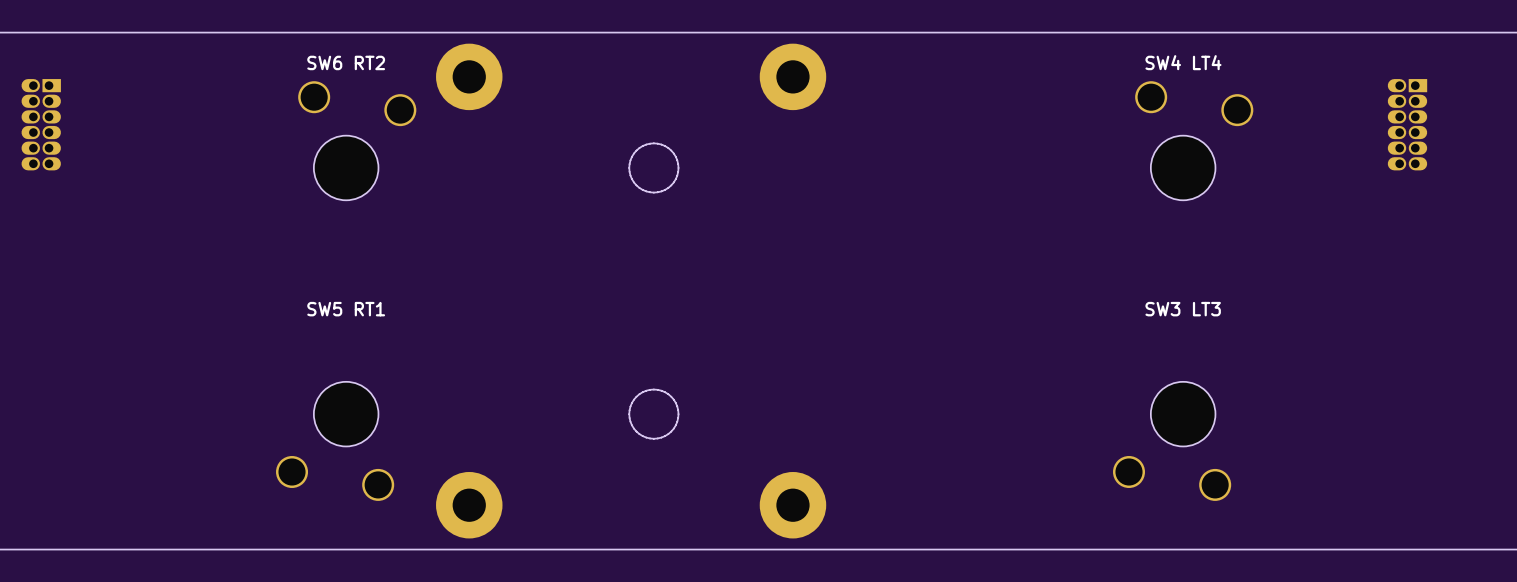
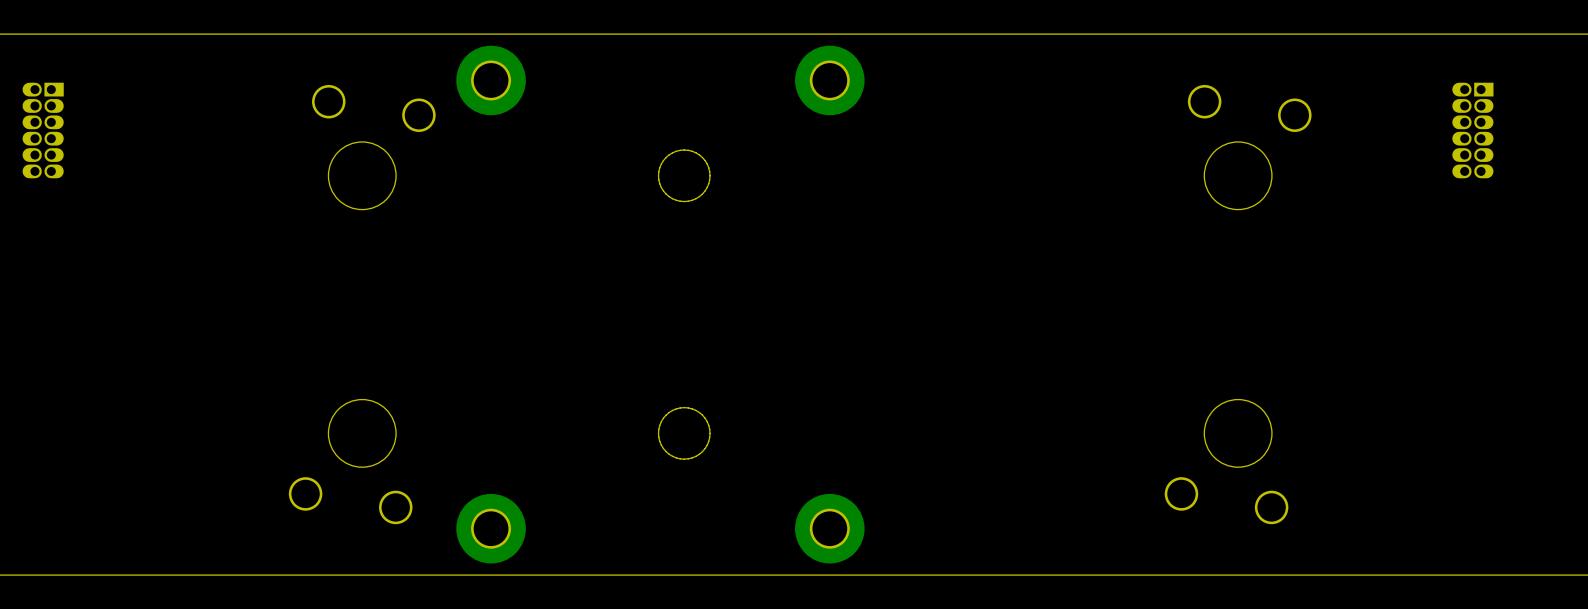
text: SW6 RT2 (346, 62) -> none
text: SW4 LT4 (1183, 62) -> none
text: SW5 RT1 (346, 309) -> none
text: SW3 LT3 (1183, 309) -> none

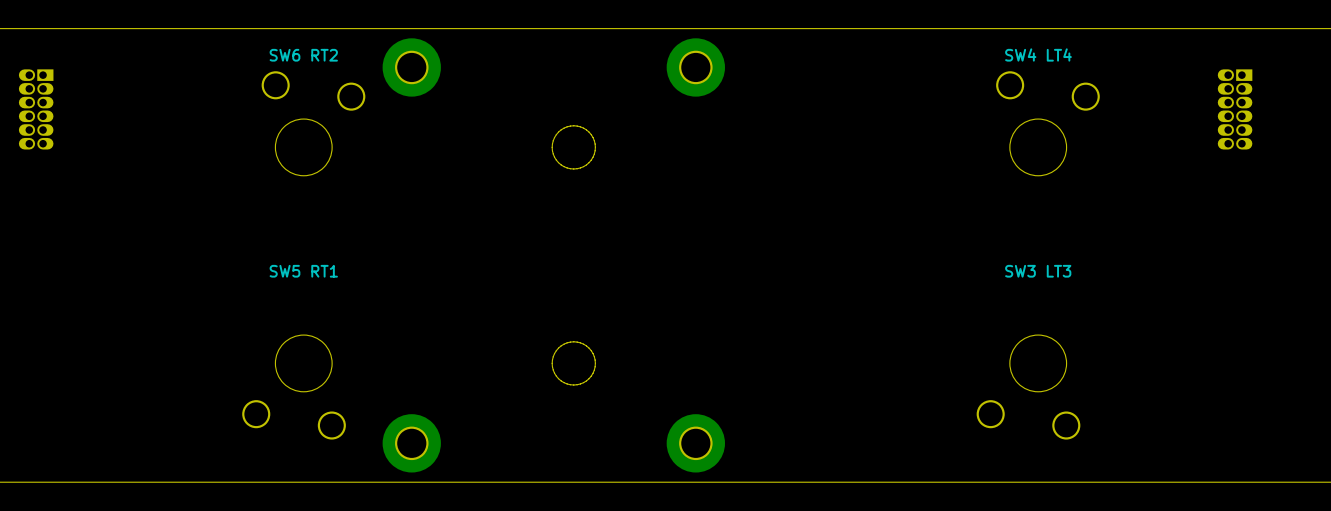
text: none -> SW6 RT2 (303, 55)
text: none -> SW4 LT4 (1038, 54)
text: none -> SW5 RT1 (303, 271)
text: none -> SW3 LT3 (1038, 271)

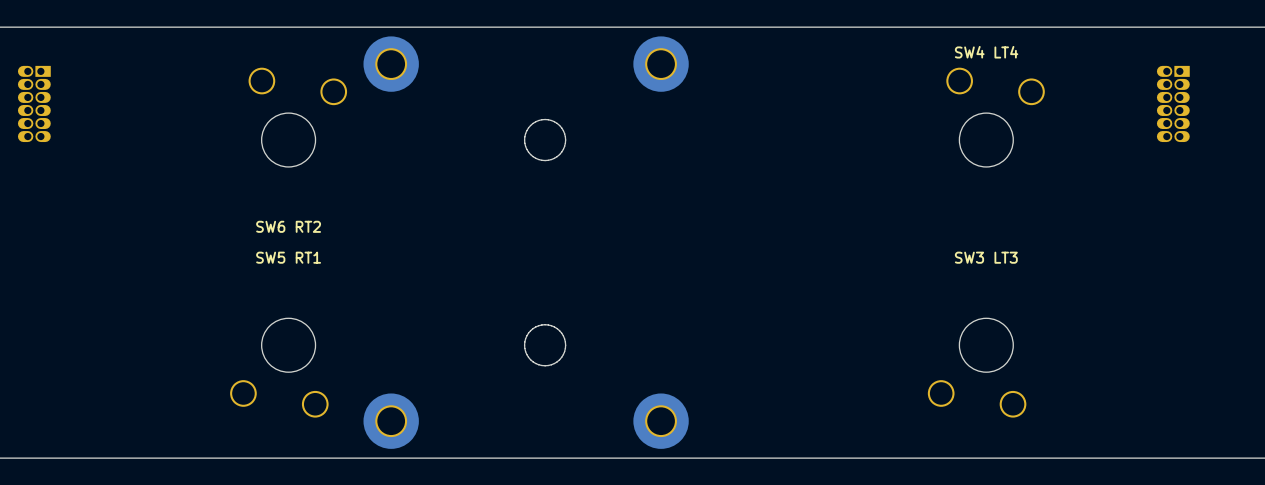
text position: SW6 RT2 (303, 55) -> SW6 RT2 (288, 226)

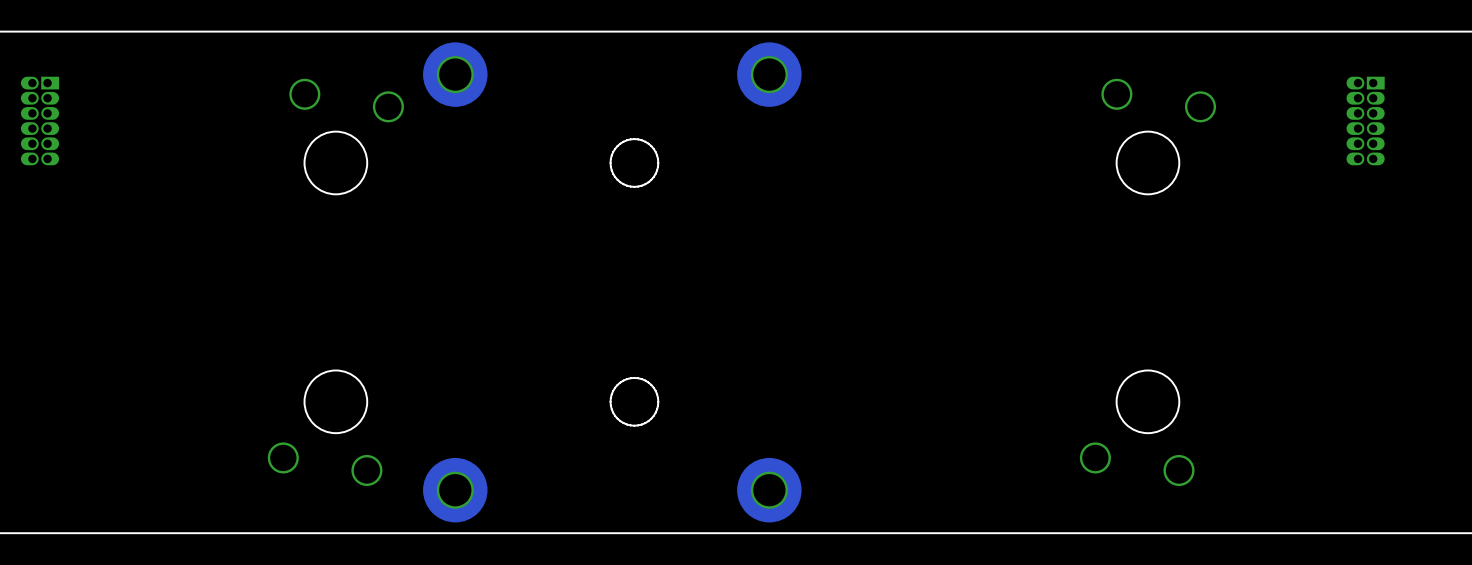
text: SW4 LT4 (986, 52) -> none
text: SW6 RT2 (288, 226) -> none
text: SW5 RT1 (288, 257) -> none
text: SW3 LT3 (986, 257) -> none

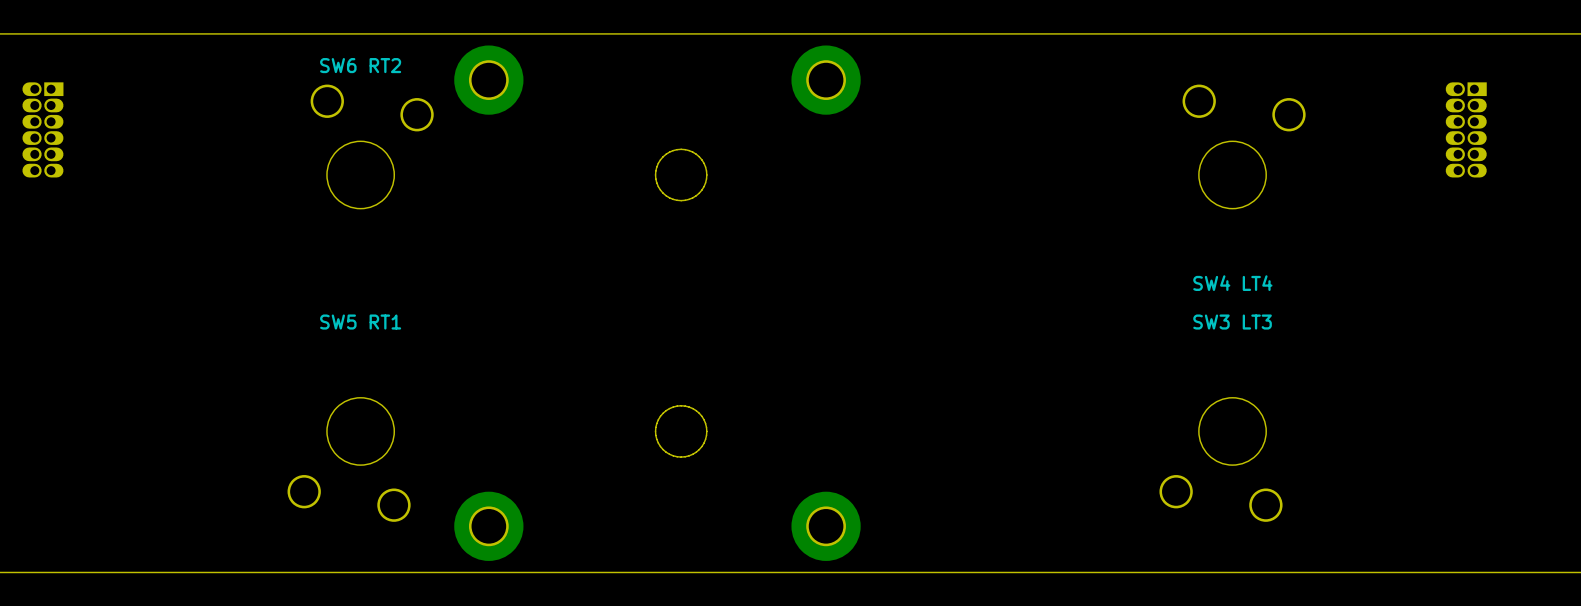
text: none -> SW6 RT2 (360, 65)
text: none -> SW4 LT4 (1232, 283)
text: none -> SW5 RT1 (360, 322)
text: none -> SW3 LT3 (1232, 322)

